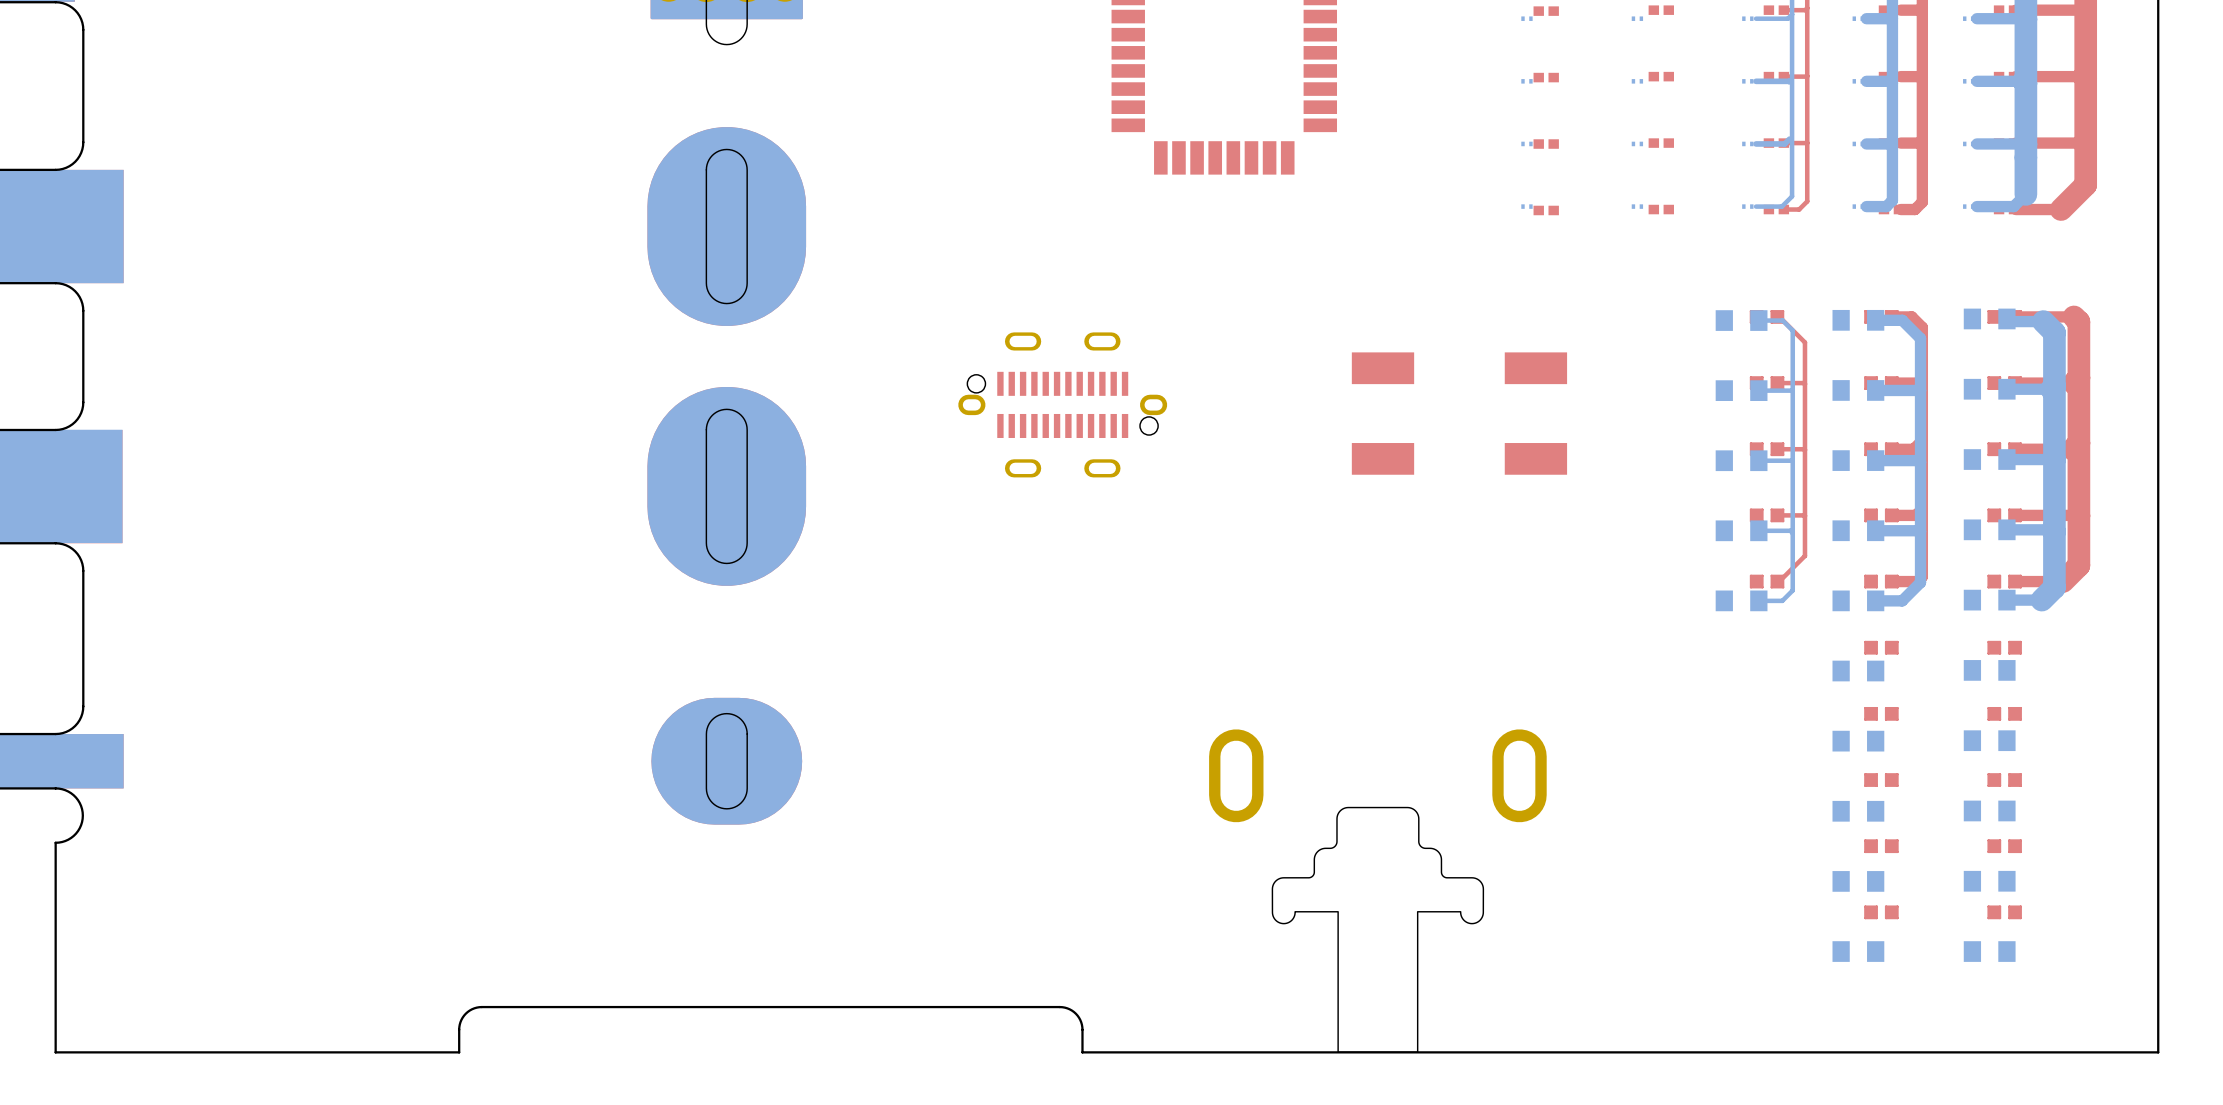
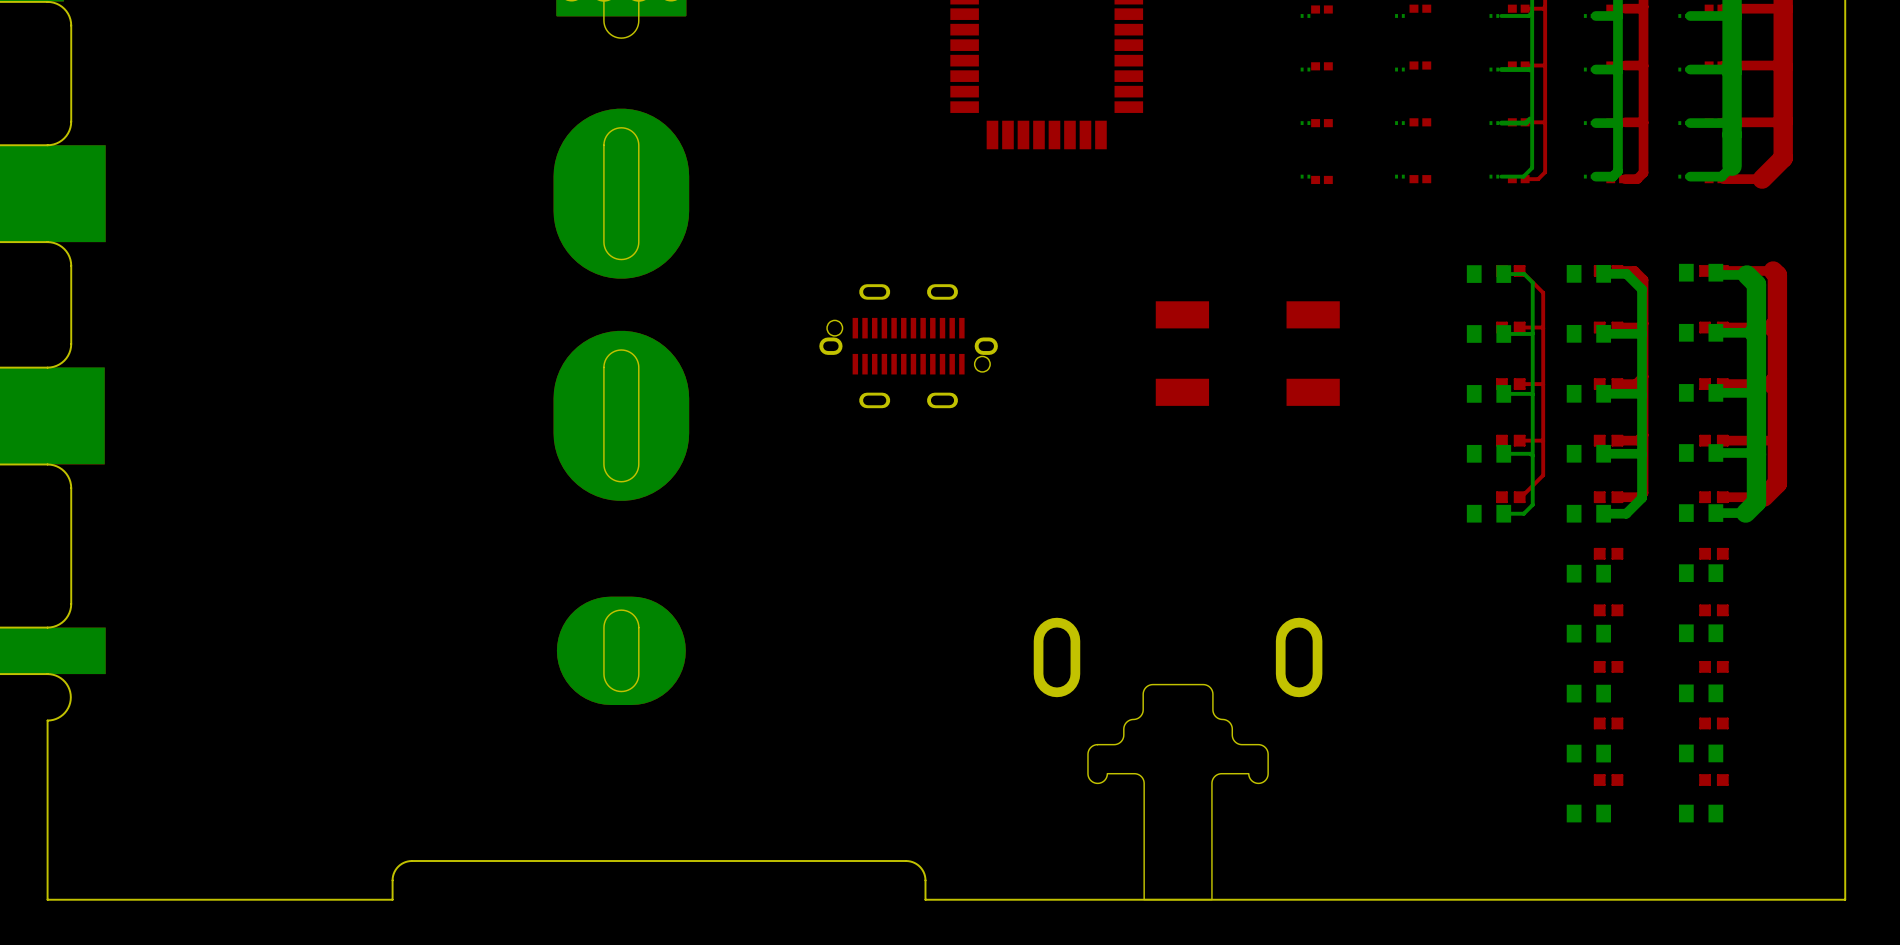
part footprint: [1209, 729, 1547, 1053] -> [1033, 617, 1323, 900]

